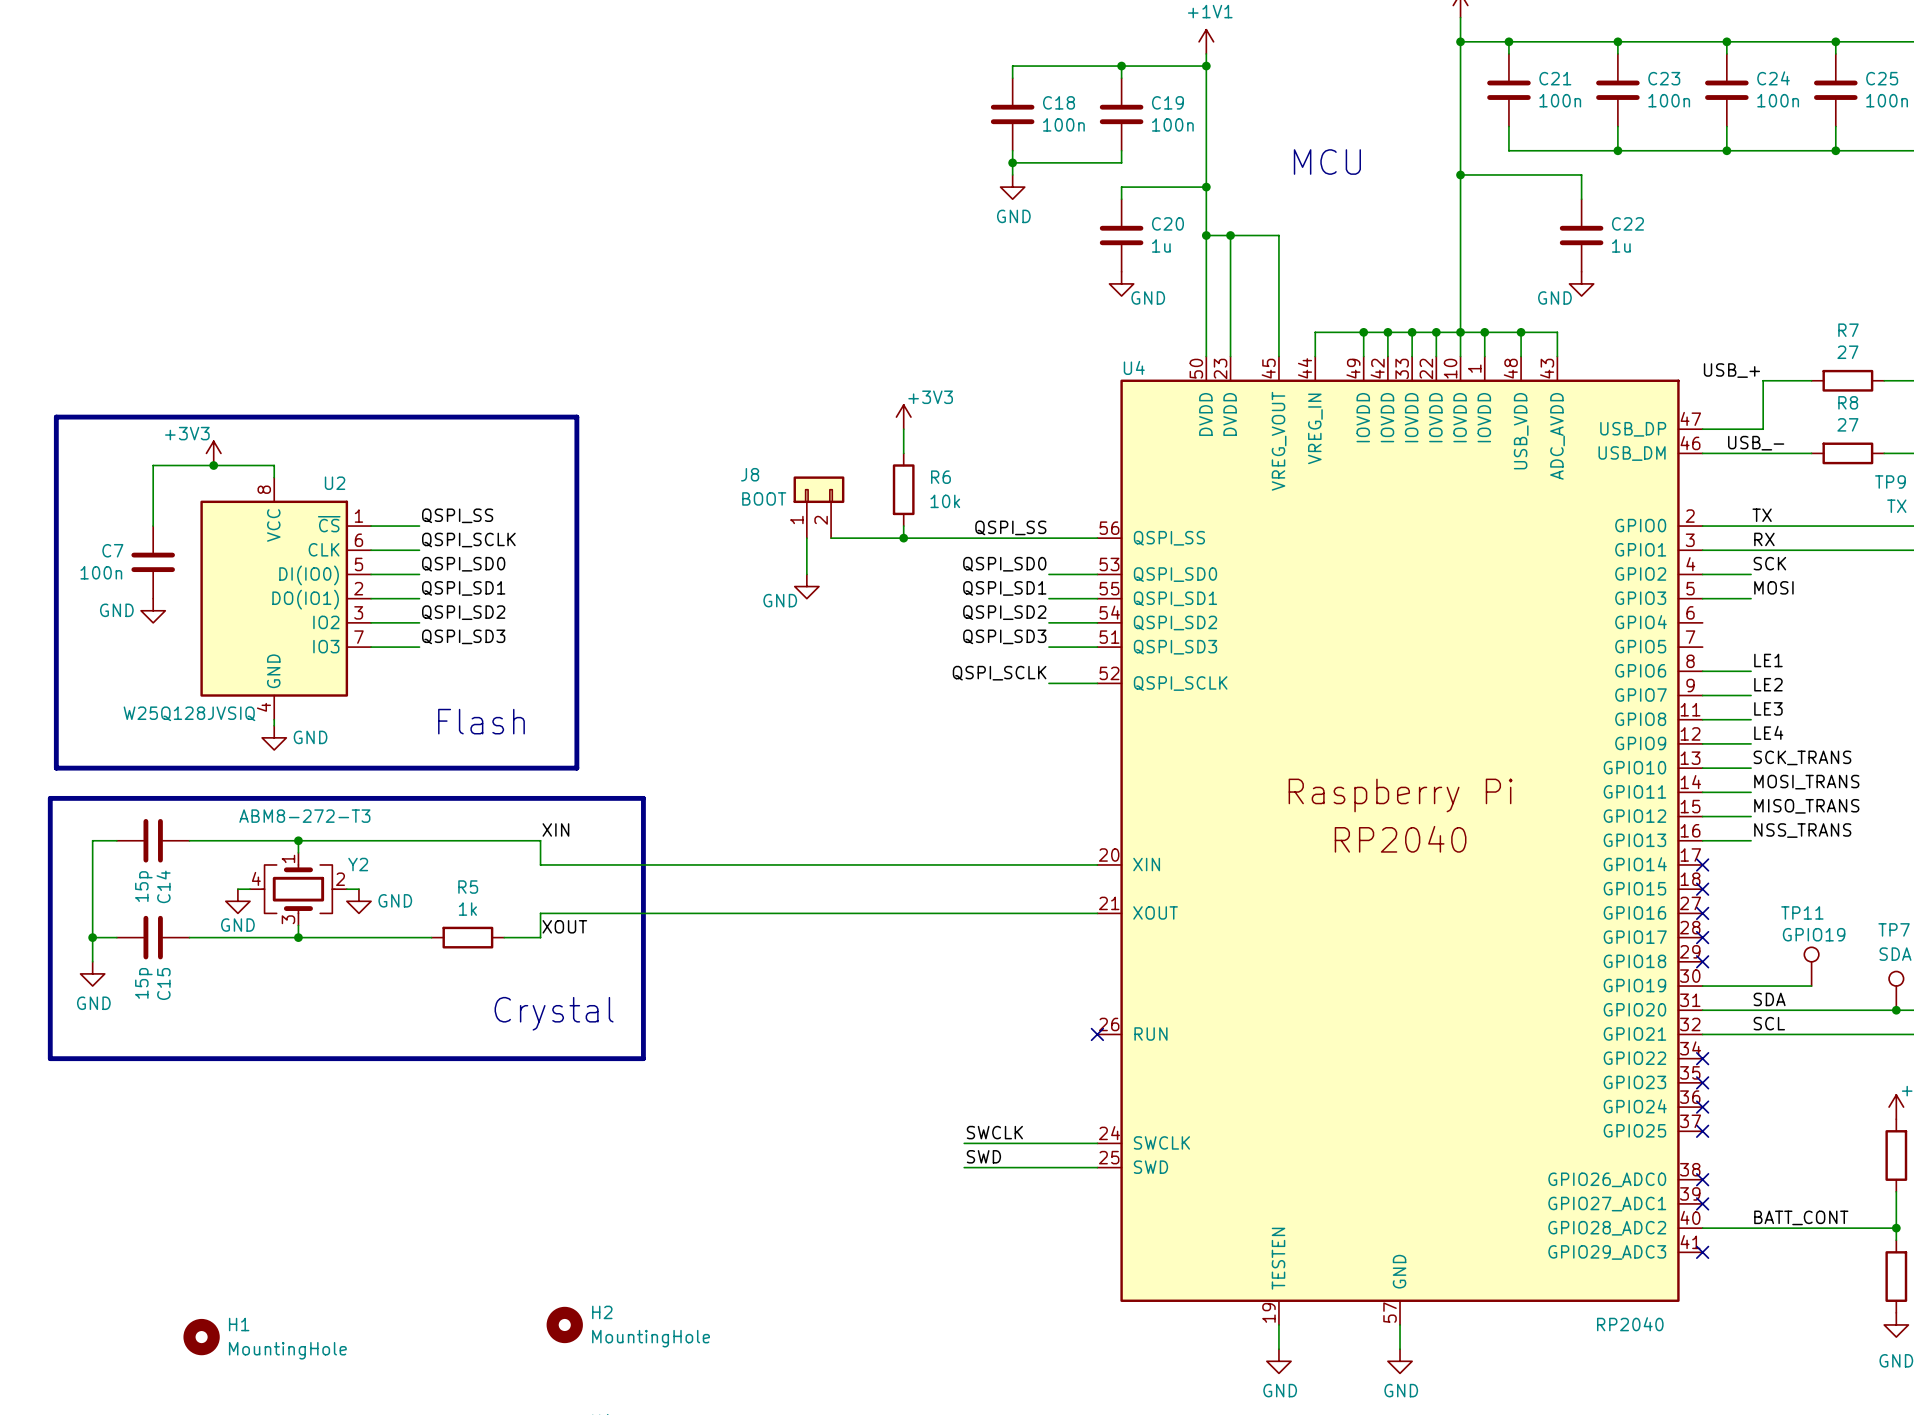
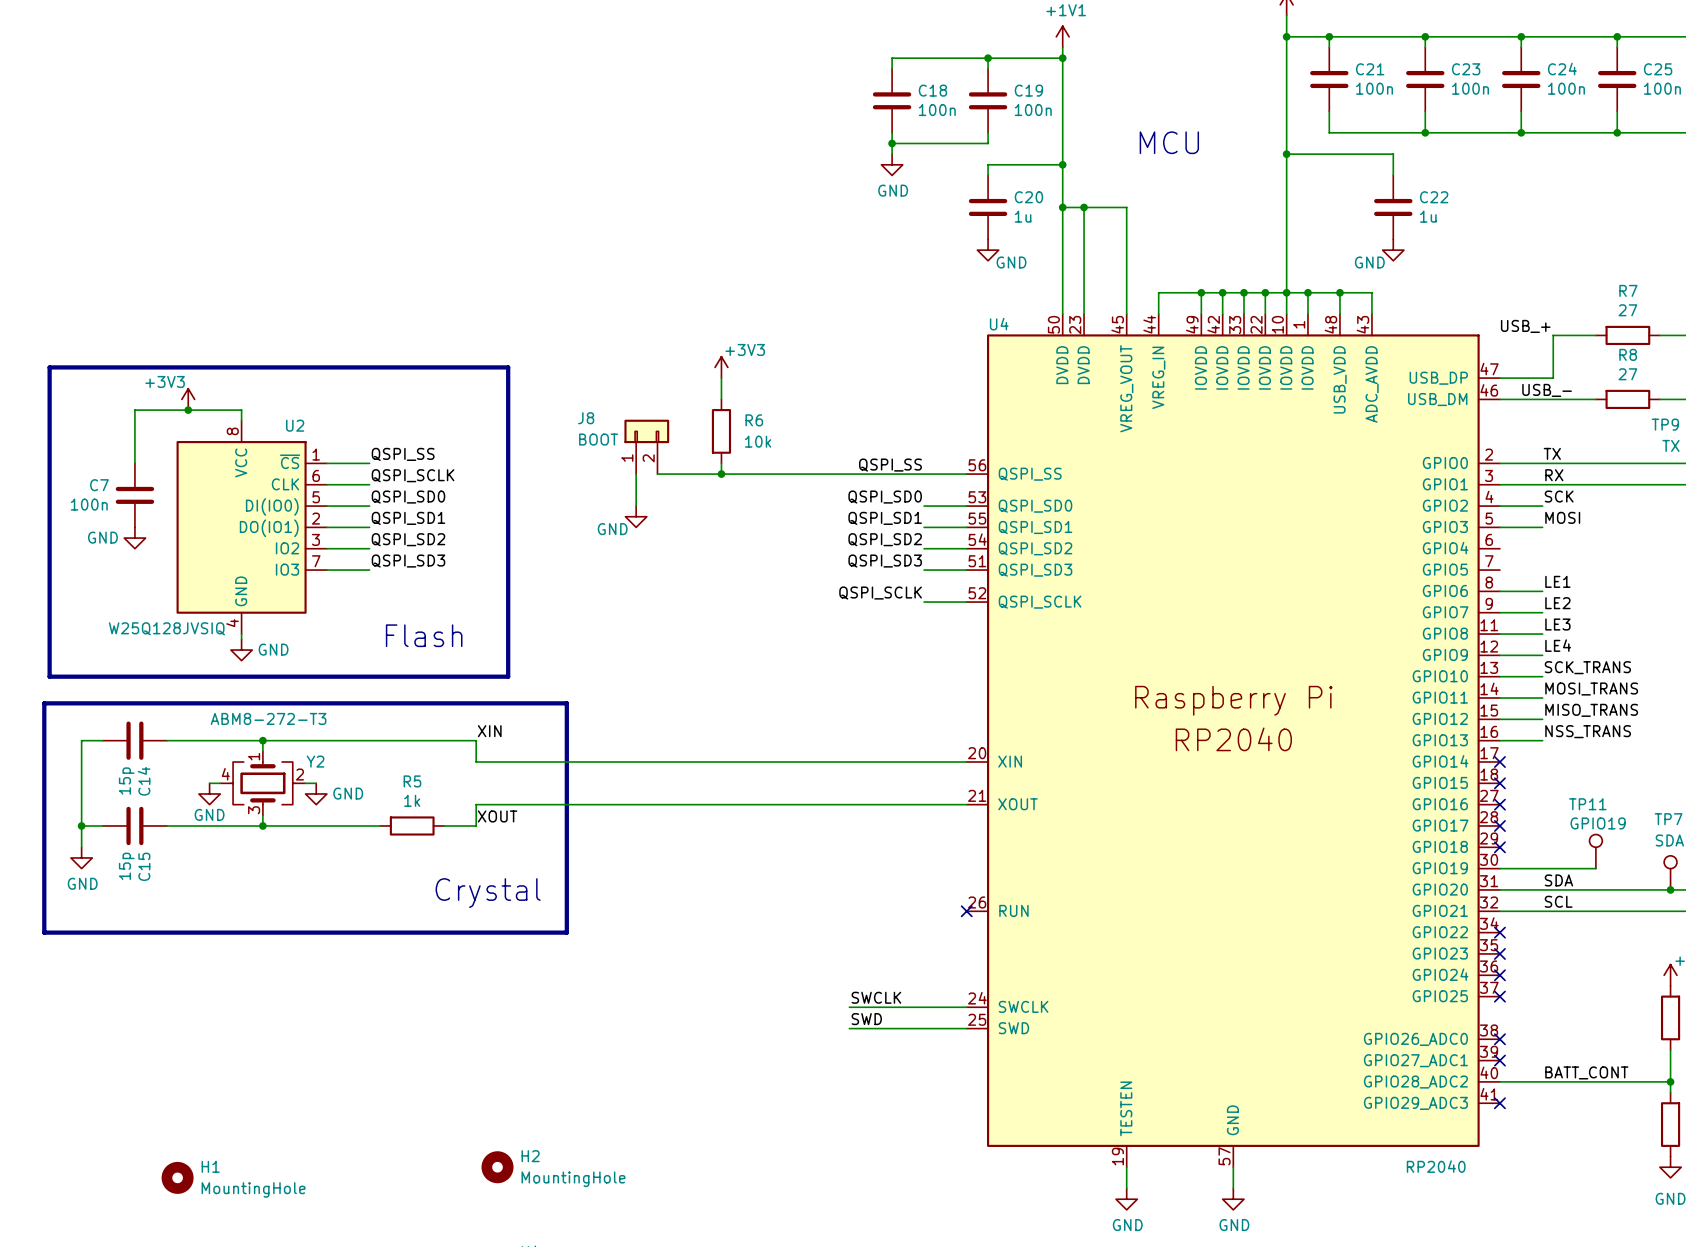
power symbol position: +3V3 (903, 417) -> +3V3 (721, 367)
wire: (903, 429) (903, 453) -> (721, 378) (721, 399)
R6 position: (903, 489) -> (721, 431)
J8 position: (818, 507) -> (646, 446)
wire: (903, 526) (903, 538) -> (721, 463) (721, 474)
wire: none -> (657, 474) (732, 474)
wire: (806, 538) (806, 574) -> (636, 474) (636, 506)
junction: none -> (721, 474)
junction: (903, 538) -> none
power symbol position: GND (806, 586) -> GND (636, 516)

